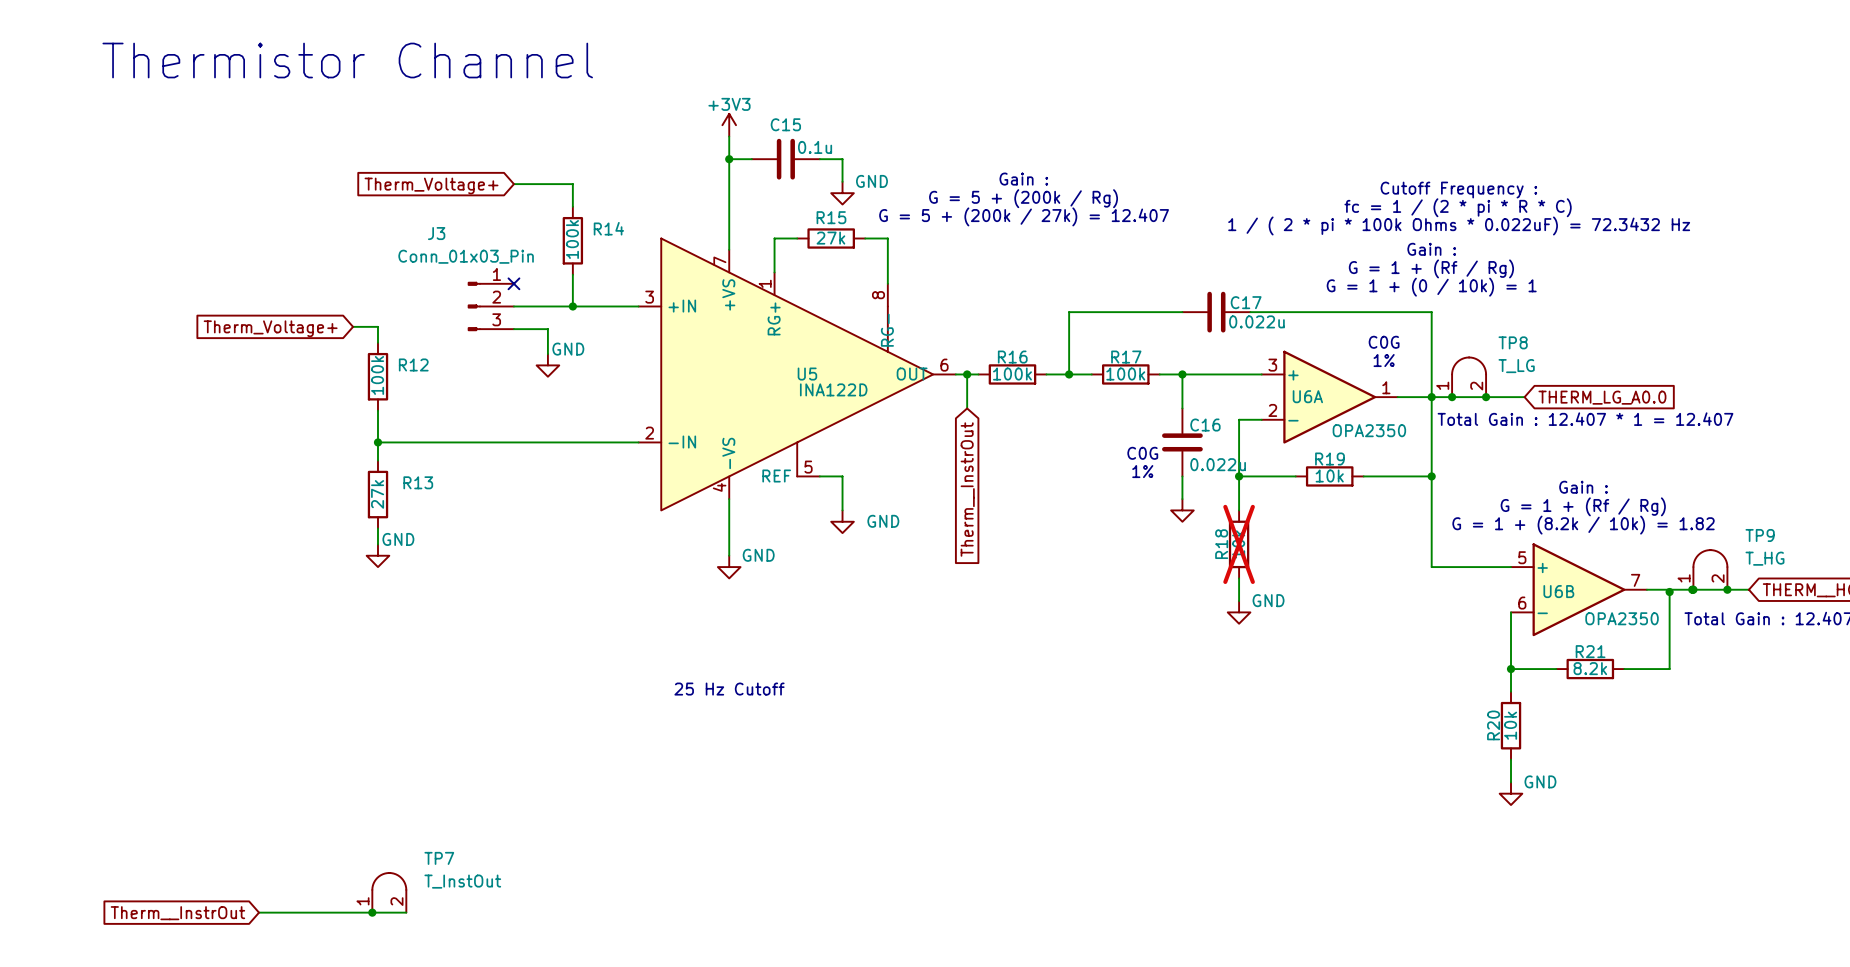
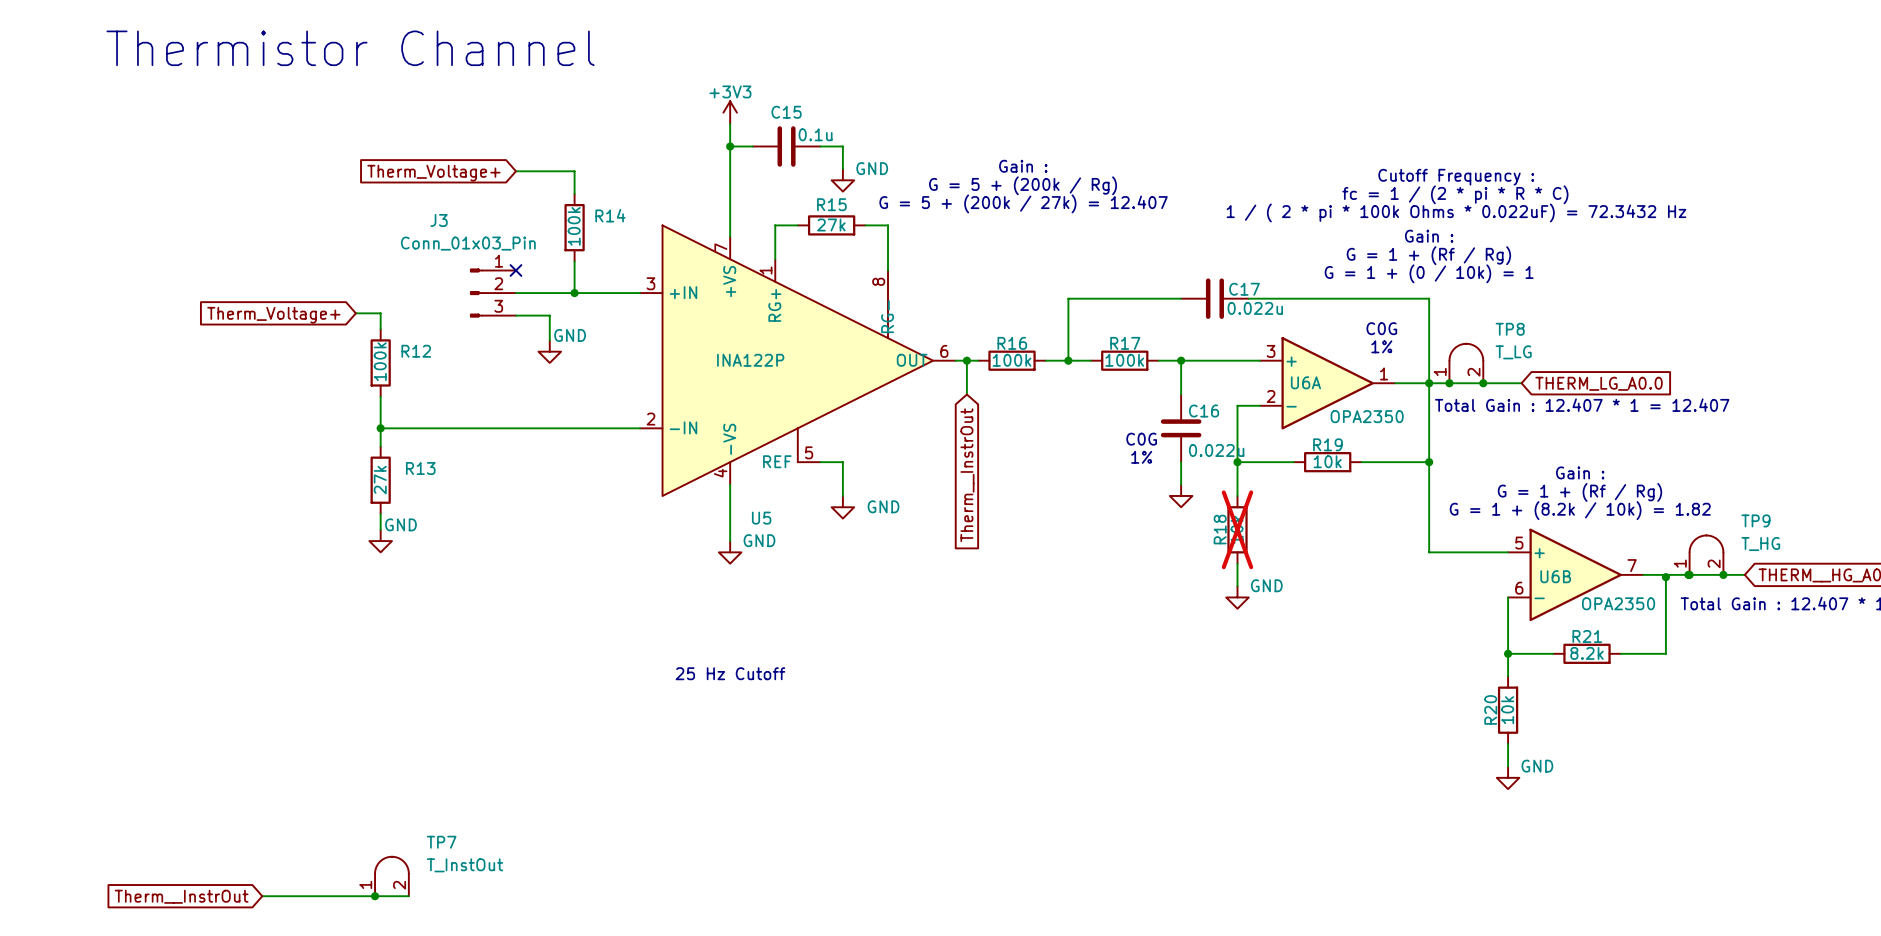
U5 name position: U5 (807, 374) -> U5 (761, 518)
U5 value: INA122D (833, 389) -> INA122P (750, 360)

